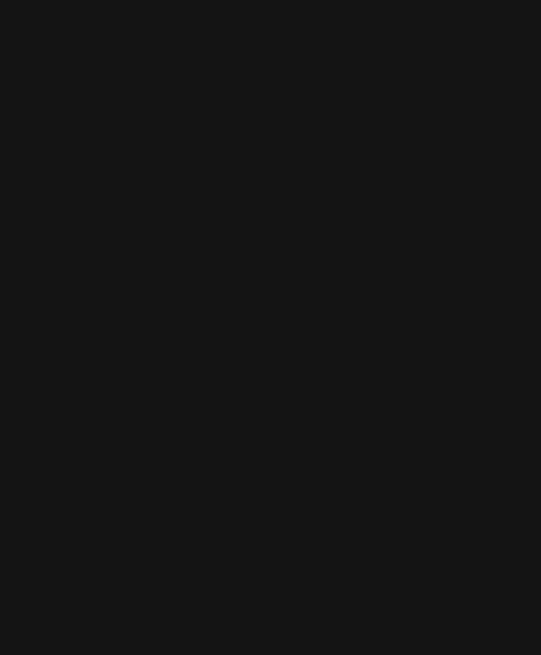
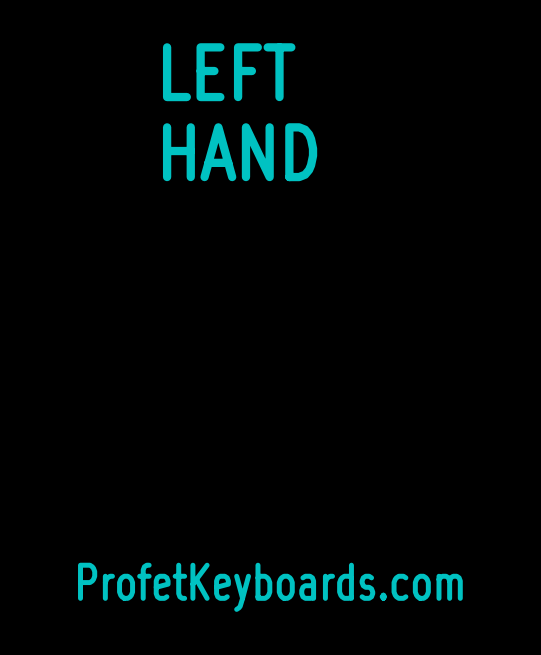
text: none -> LEFT (229, 72)
text: none -> HAND (240, 152)
text: none -> ProfetKeyboards.com (270, 587)

